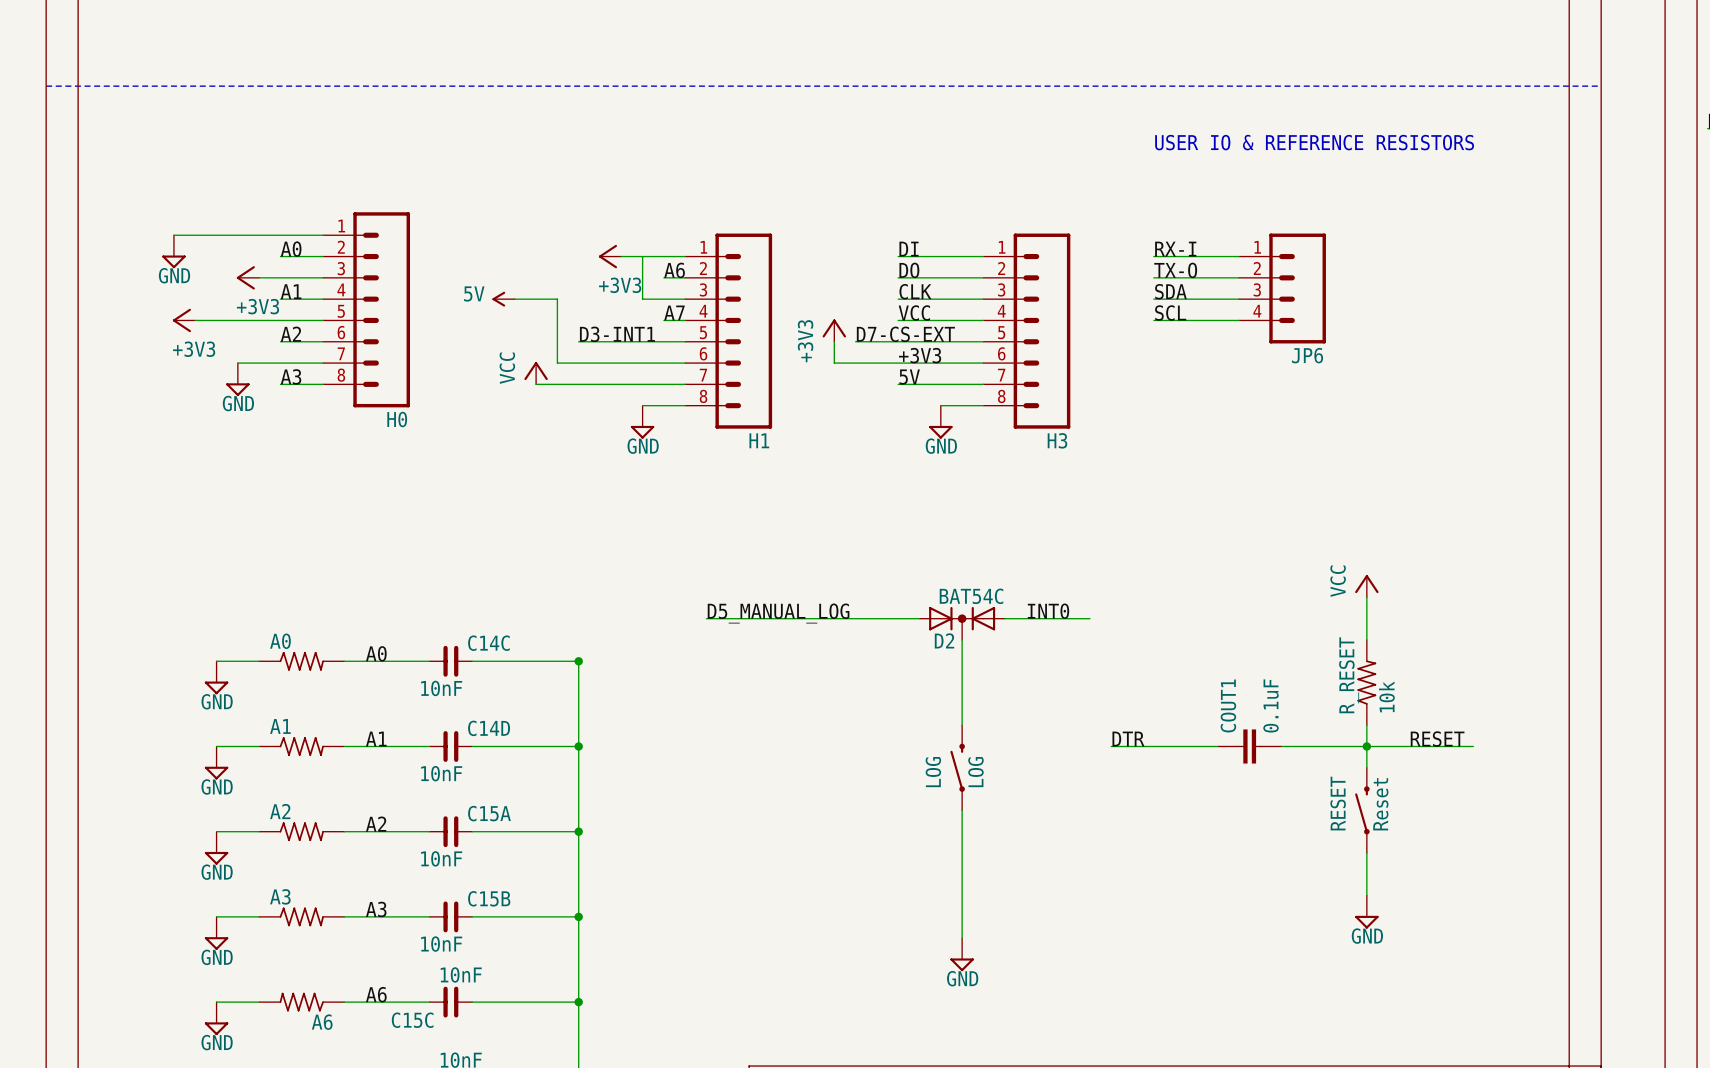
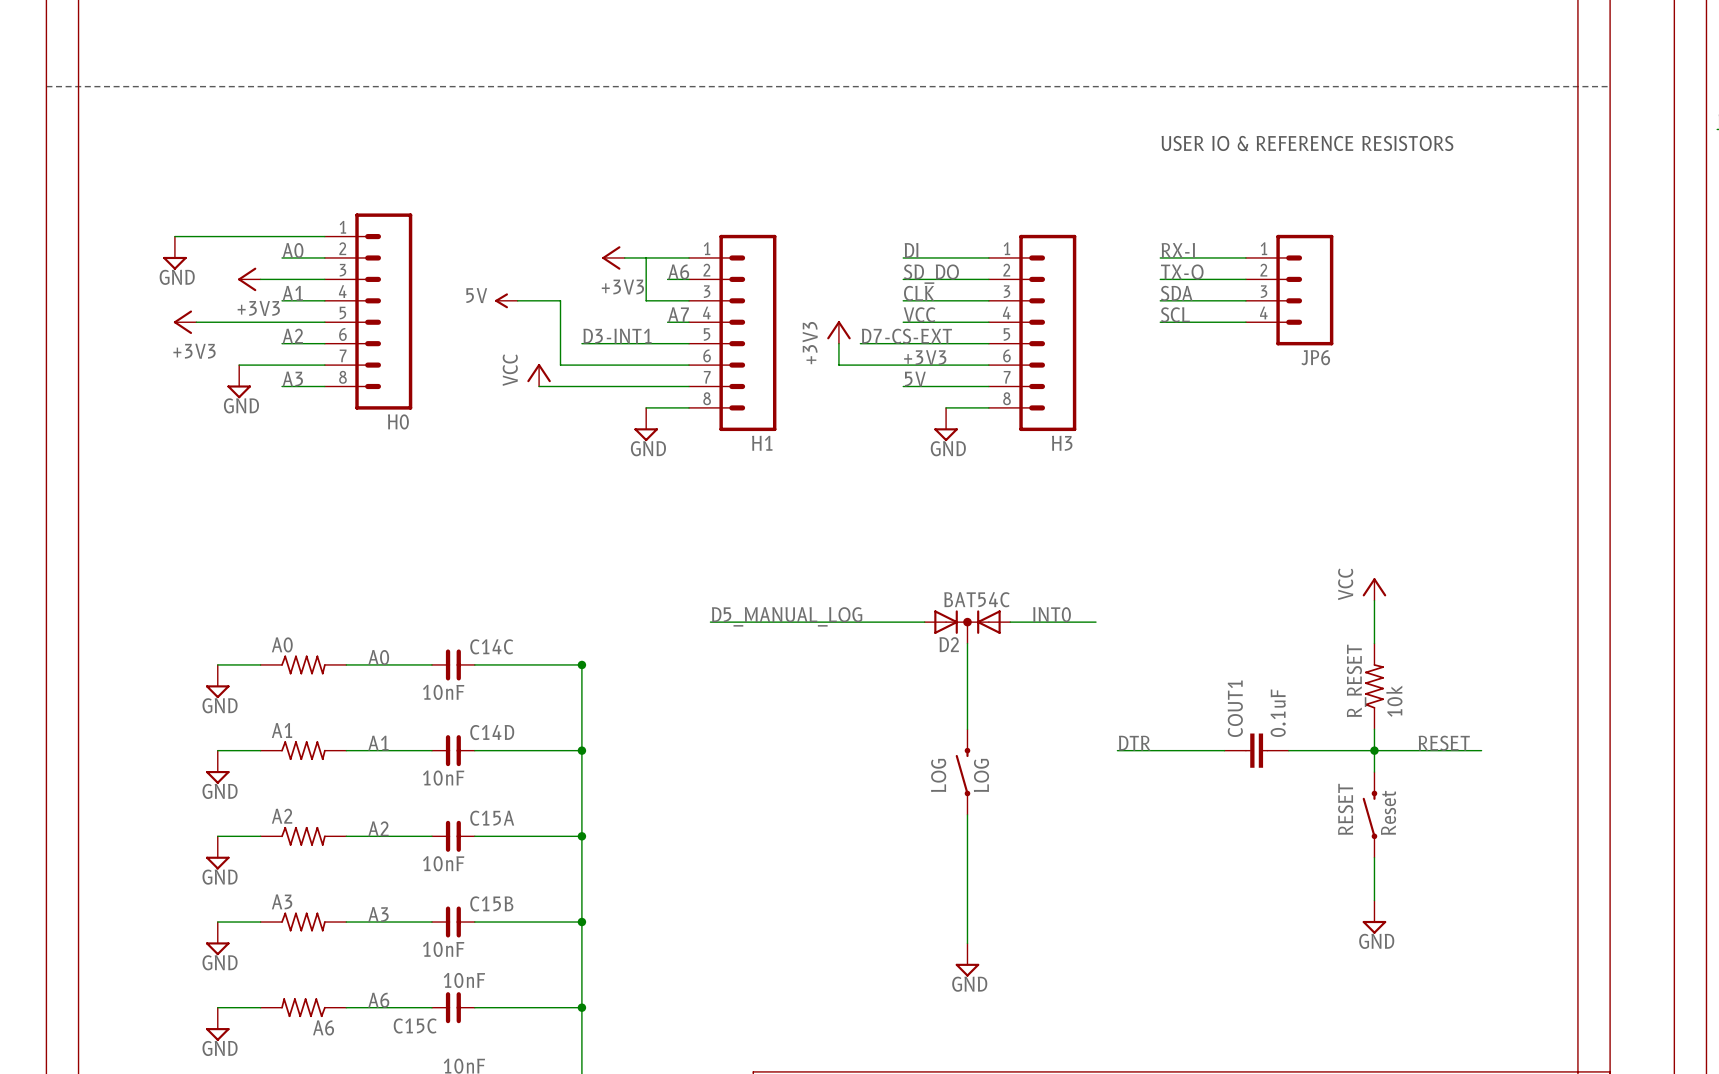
label: DO (909, 270) -> SD_DO (931, 274)

